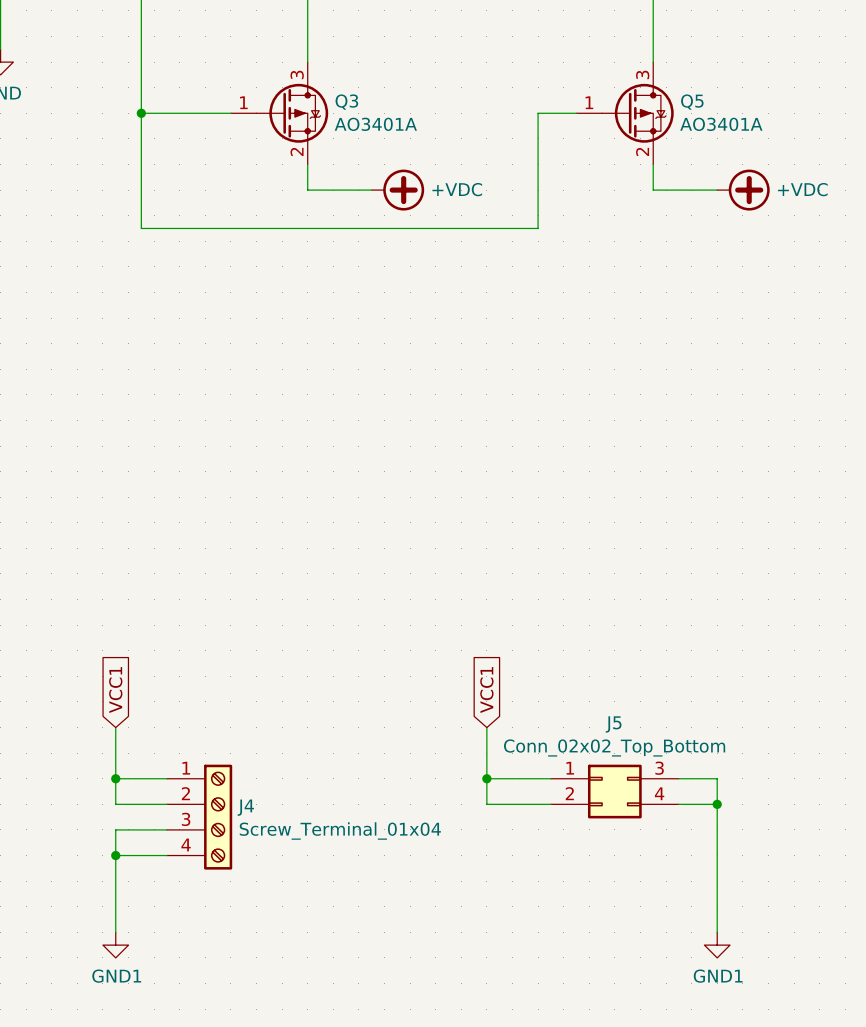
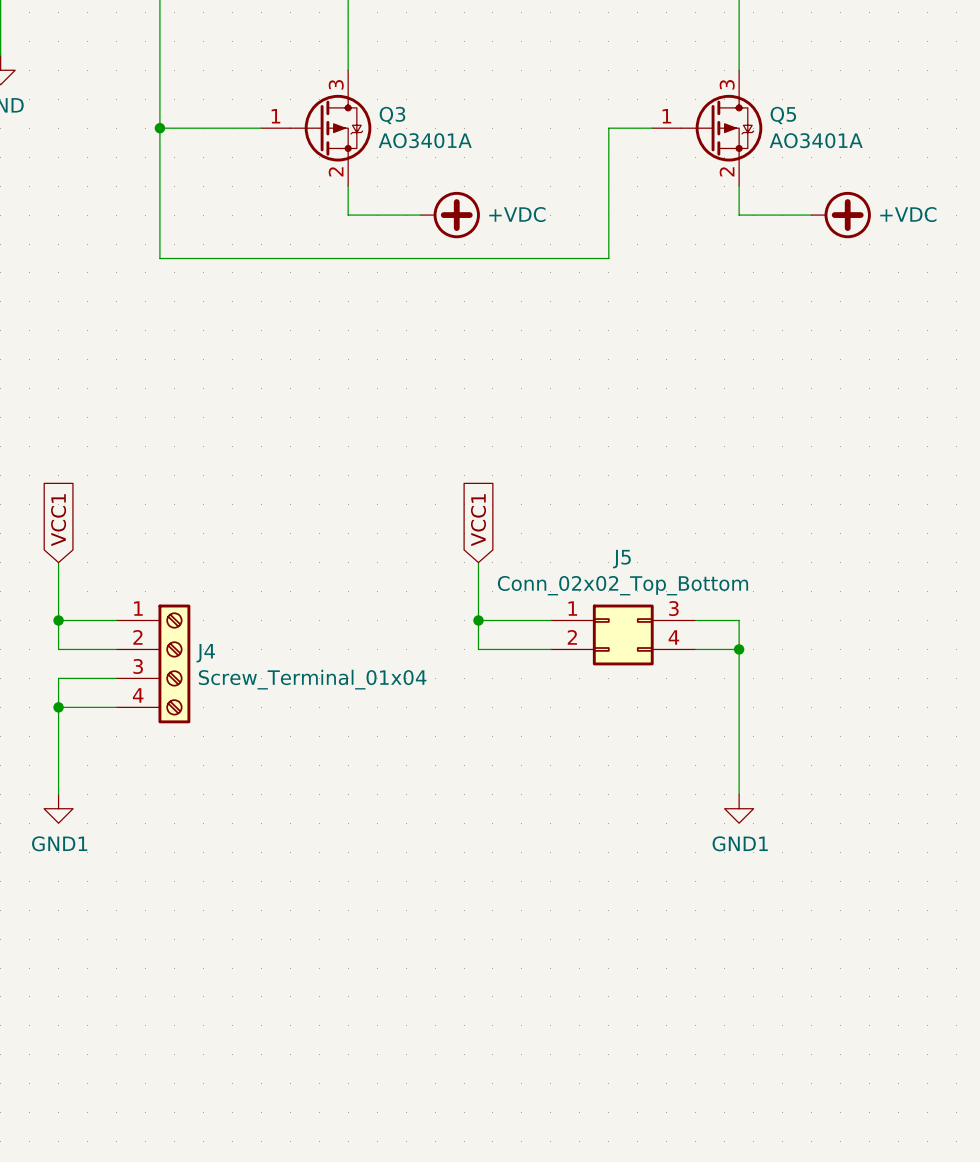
global label: none -> VCC1 (58, 520)
global label: none -> VCC1 (478, 520)
junction: none -> (58, 620)
junction: none -> (478, 620)
junction: none -> (739, 649)
junction: none -> (58, 707)
global label: VCC1 (115, 690) -> none
global label: VCC1 (486, 690) -> none
wire: (115, 727) (115, 804) (166, 804) -> (58, 562) (58, 649) (116, 649)
wire: (486, 727) (486, 804) (550, 804) -> (478, 562) (478, 649) (550, 649)
wire: (115, 778) (166, 778) -> (58, 620) (116, 620)
junction: (115, 778) -> none
wire: (486, 778) (550, 778) -> (478, 620) (550, 620)
junction: (486, 778) -> none
wire: (678, 778) (717, 778) (717, 932) -> (695, 620) (739, 620) (739, 794)
J5 position: (614, 791) -> (623, 634)
wire: (678, 804) (717, 804) -> (695, 649) (739, 649)
junction: (717, 804) -> none
J4 position: (199, 817) -> (153, 663)
wire: (166, 829) (115, 829) (115, 932) -> (116, 678) (58, 678) (58, 794)
wire: (115, 855) (166, 855) -> (58, 707) (116, 707)
junction: (115, 855) -> none
power symbol position: GND1 (115, 945) -> GND1 (58, 808)
power symbol position: GND1 (717, 945) -> GND1 (739, 808)

